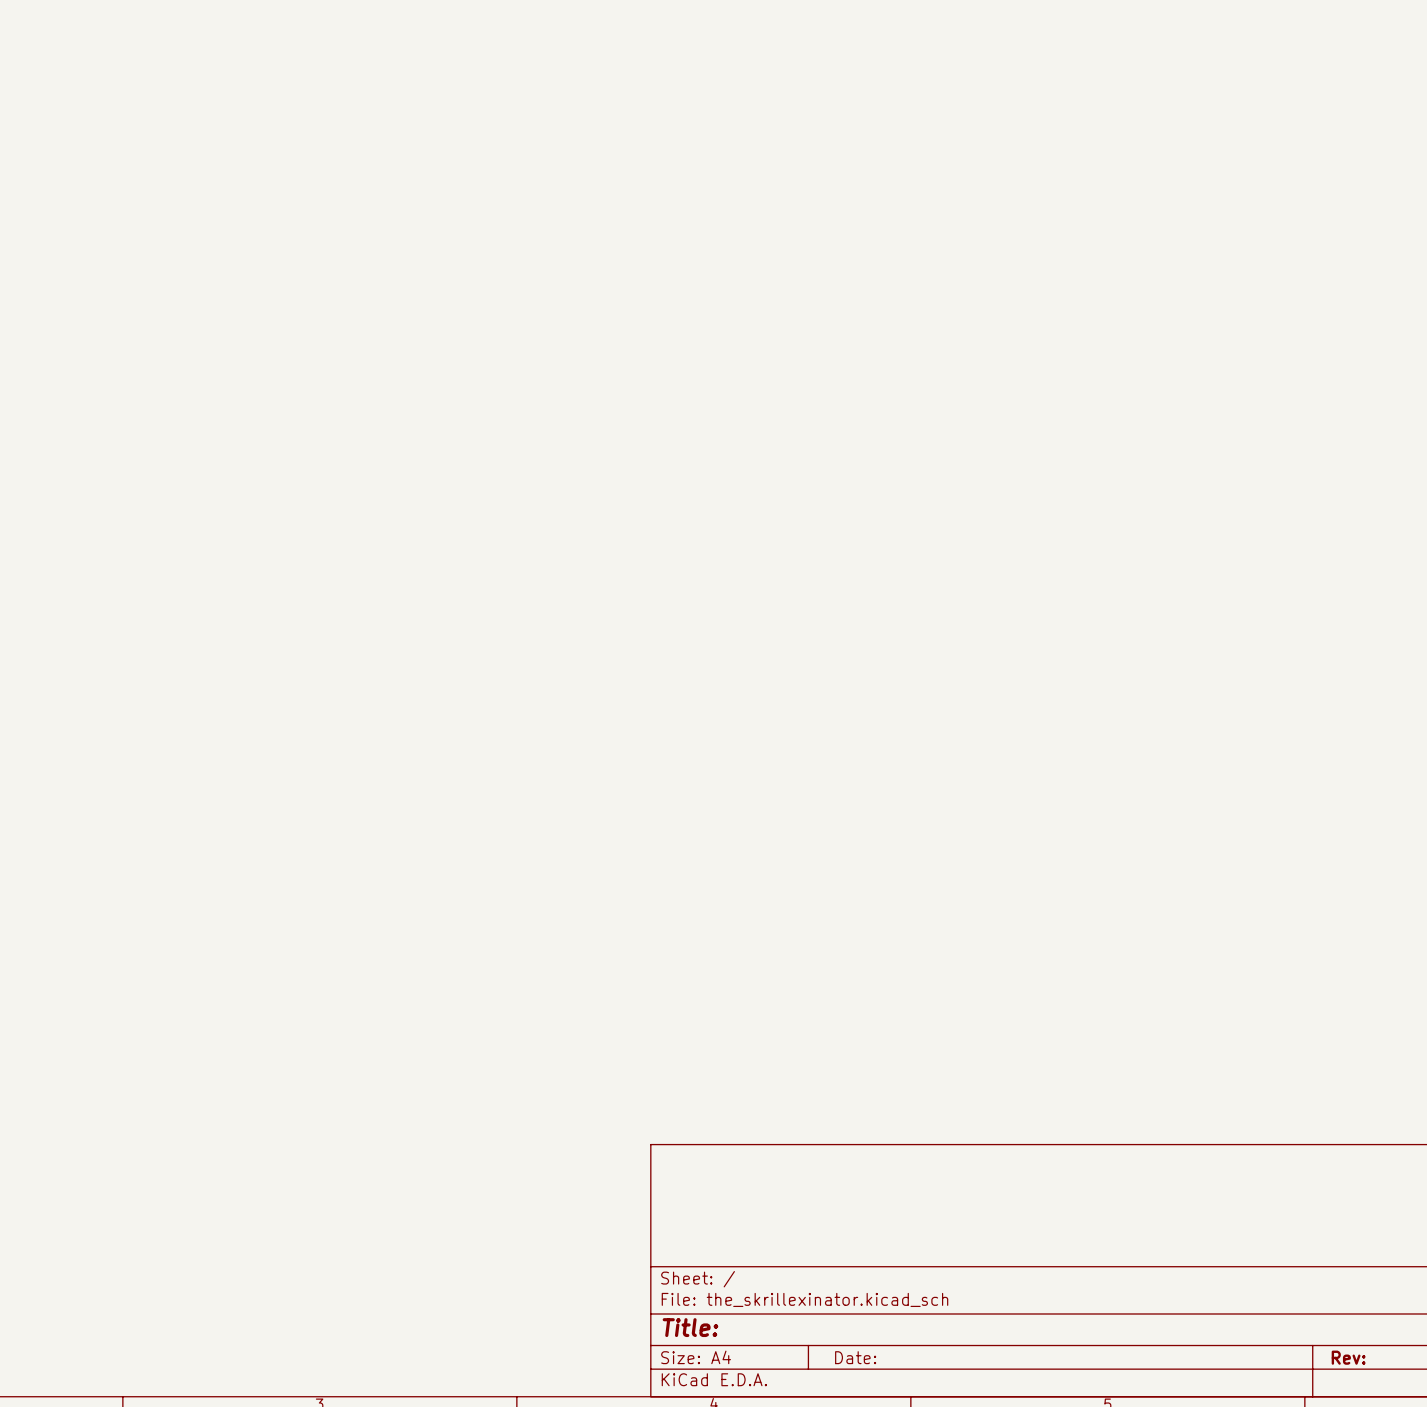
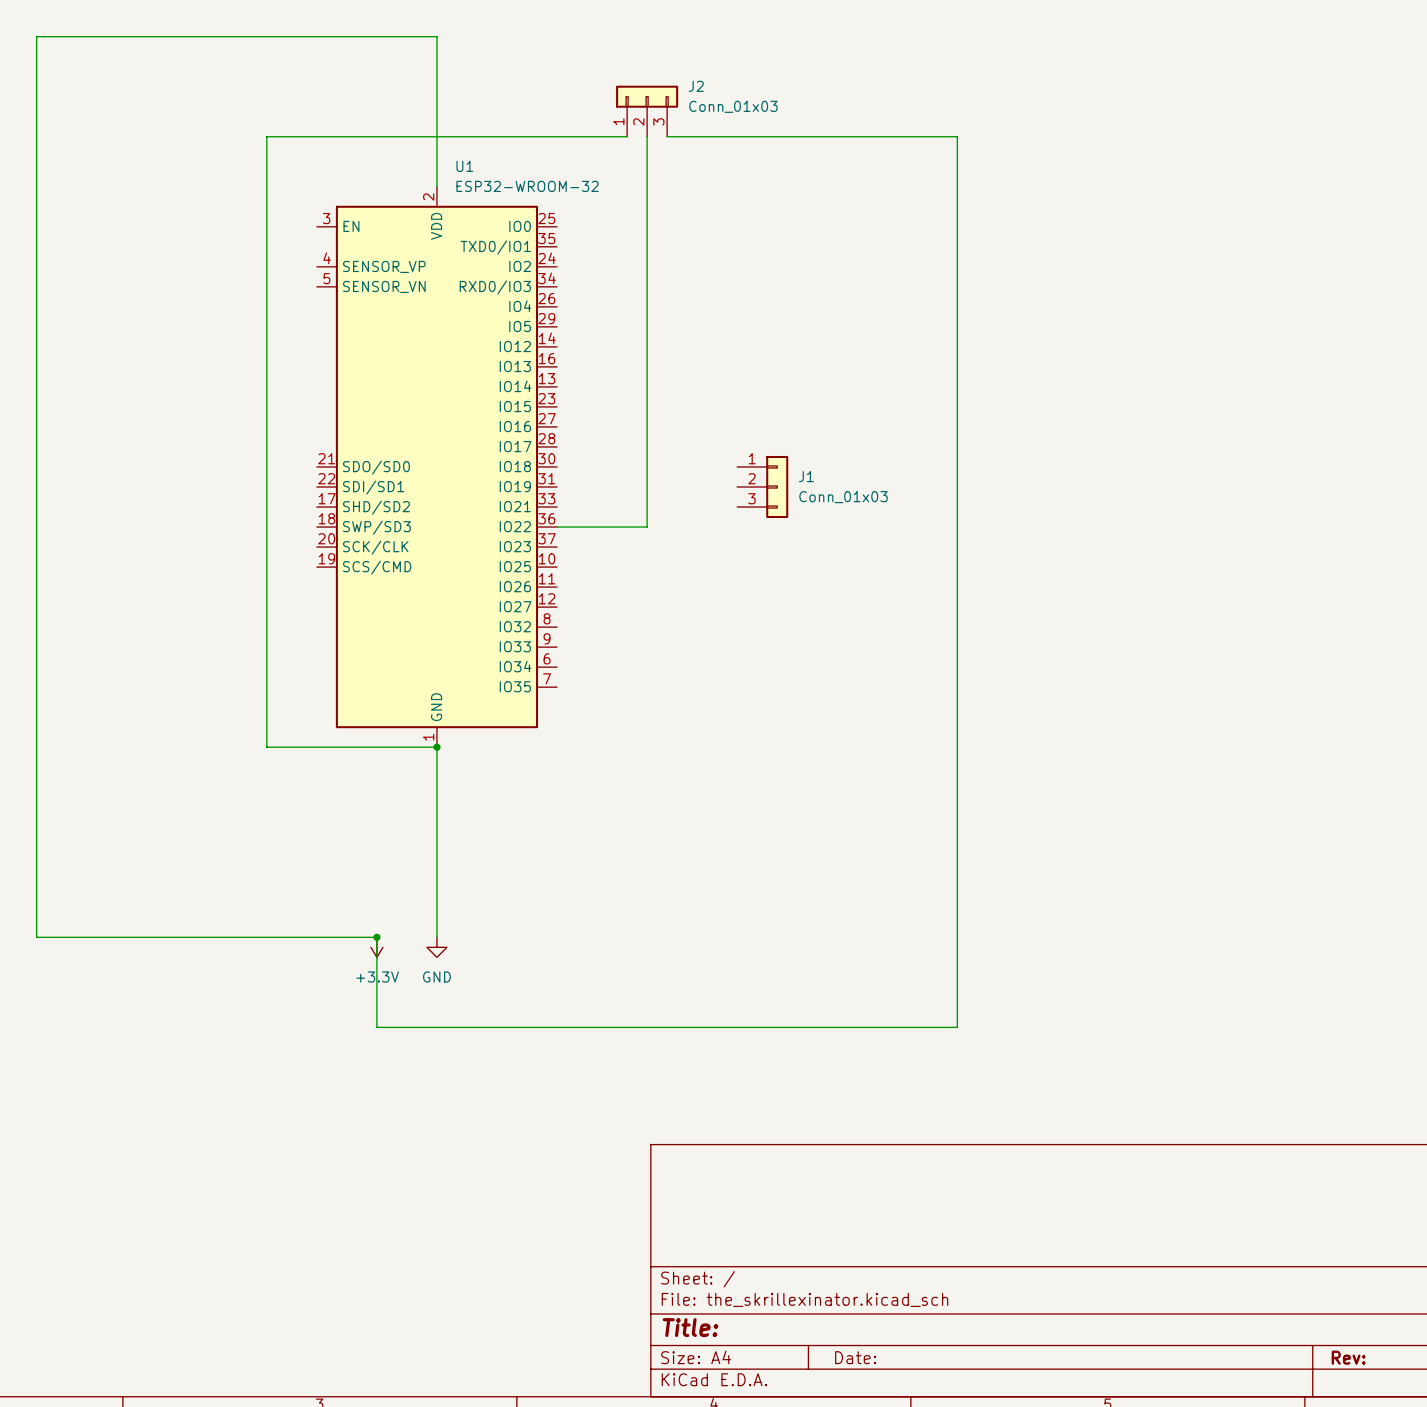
J2: none -> Conn_01x03 (647, 111)
wire: none -> (627, 136) (266, 136) (266, 747) (436, 747) (436, 937)
wire: none -> (647, 136) (647, 527) (557, 527)
wire: none -> (667, 136) (957, 136) (957, 1027) (376, 1027) (376, 937) (36, 937) (36, 36) (436, 36) (436, 186)
U1: none -> ESP32-WROOM-32 (436, 466)
J1: none -> Conn_01x03 (762, 487)
junction: none -> (436, 747)
junction: none -> (376, 937)
power symbol: none -> +3.3V (376, 947)
power symbol: none -> GND (436, 947)

